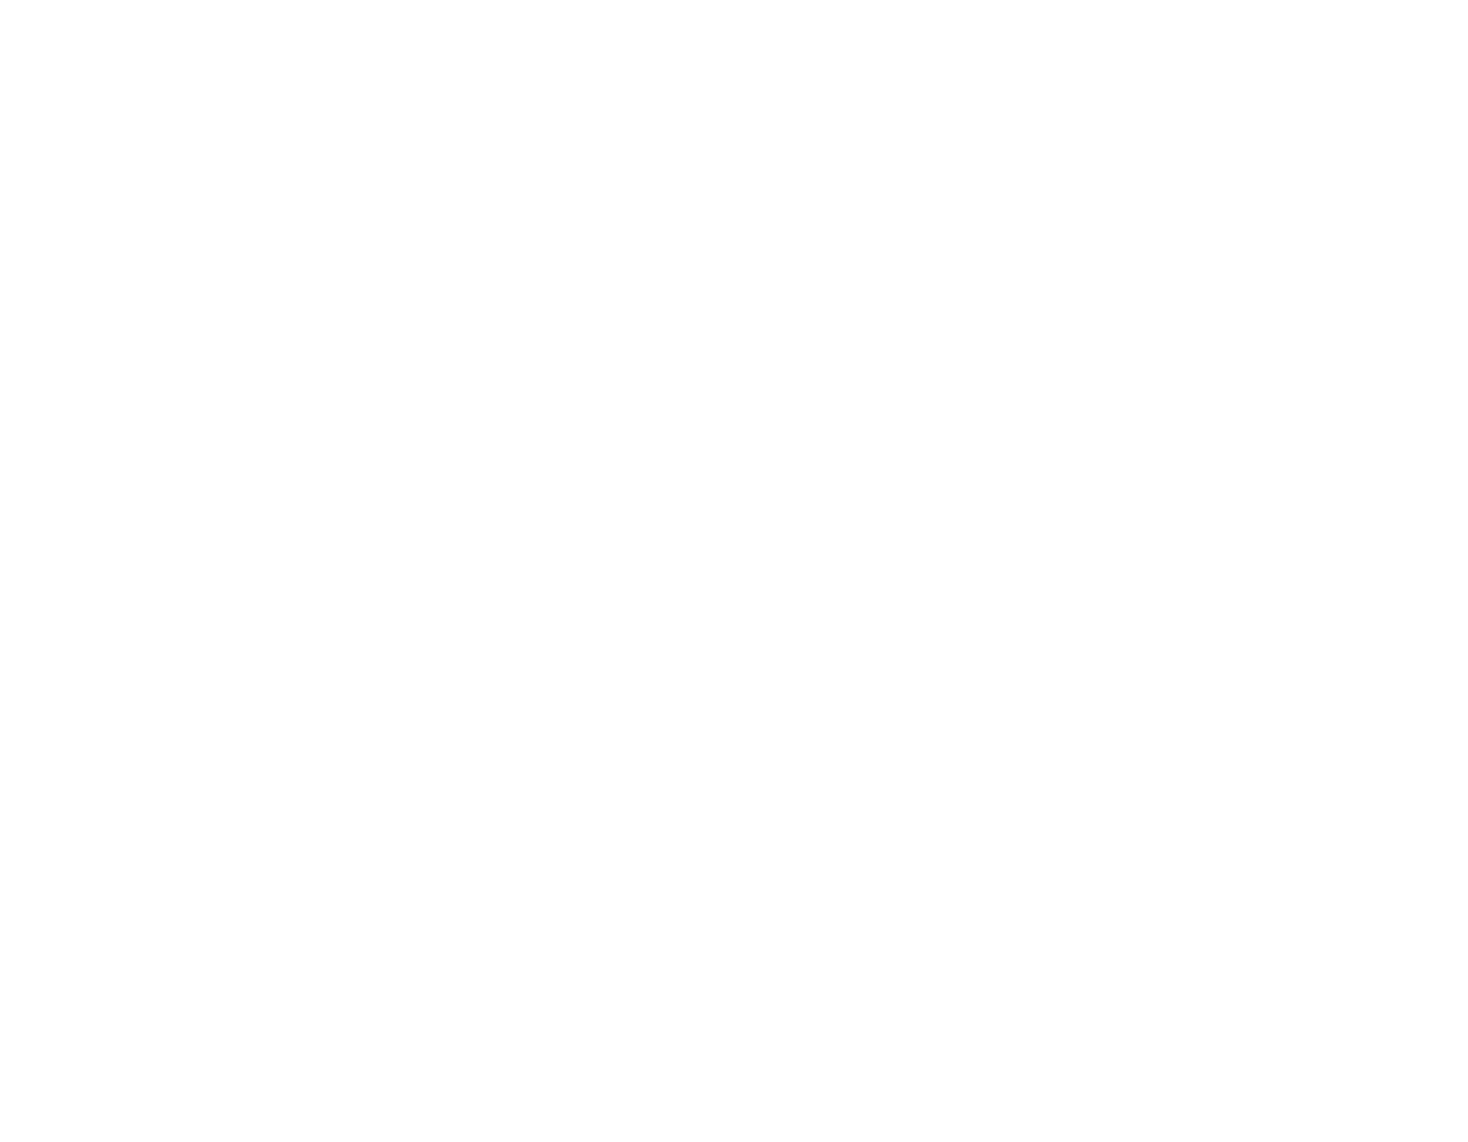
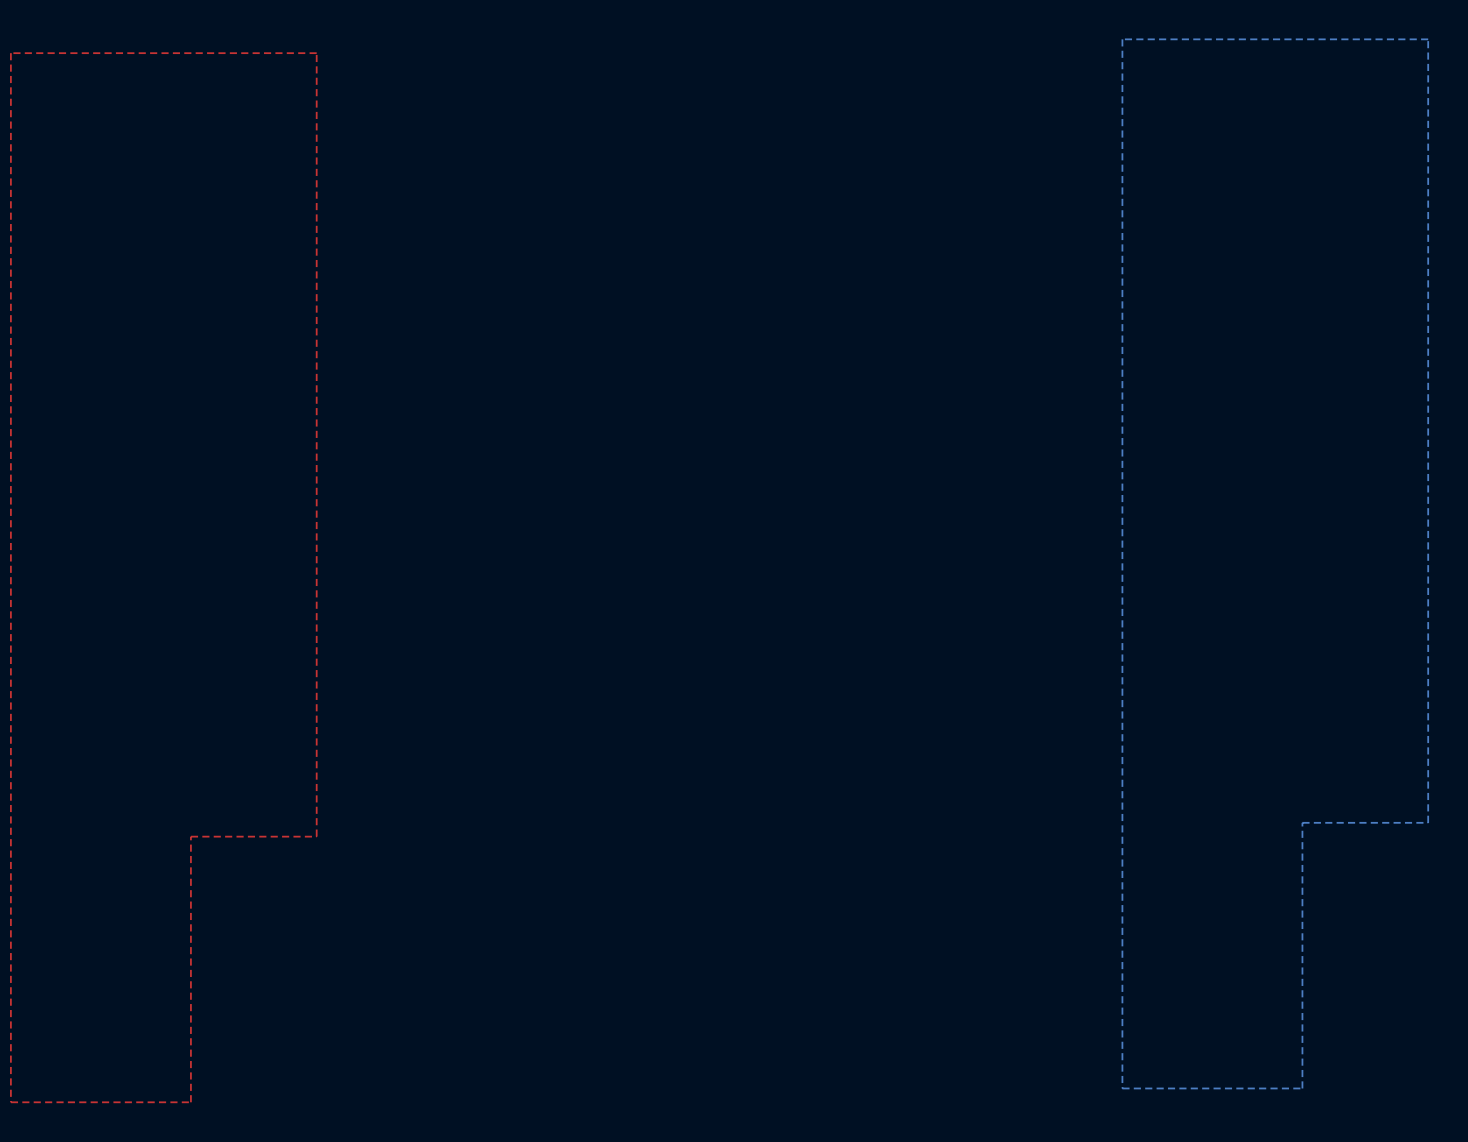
bottom zone outline: none -> (1122, 39) (1428, 39) (1428, 822) (1302, 822) (1302, 1088) (1122, 1088) (1122, 39)
top zone outline: none -> (10, 53) (316, 53) (316, 836) (190, 836) (190, 1102) (10, 1102) (10, 53)

